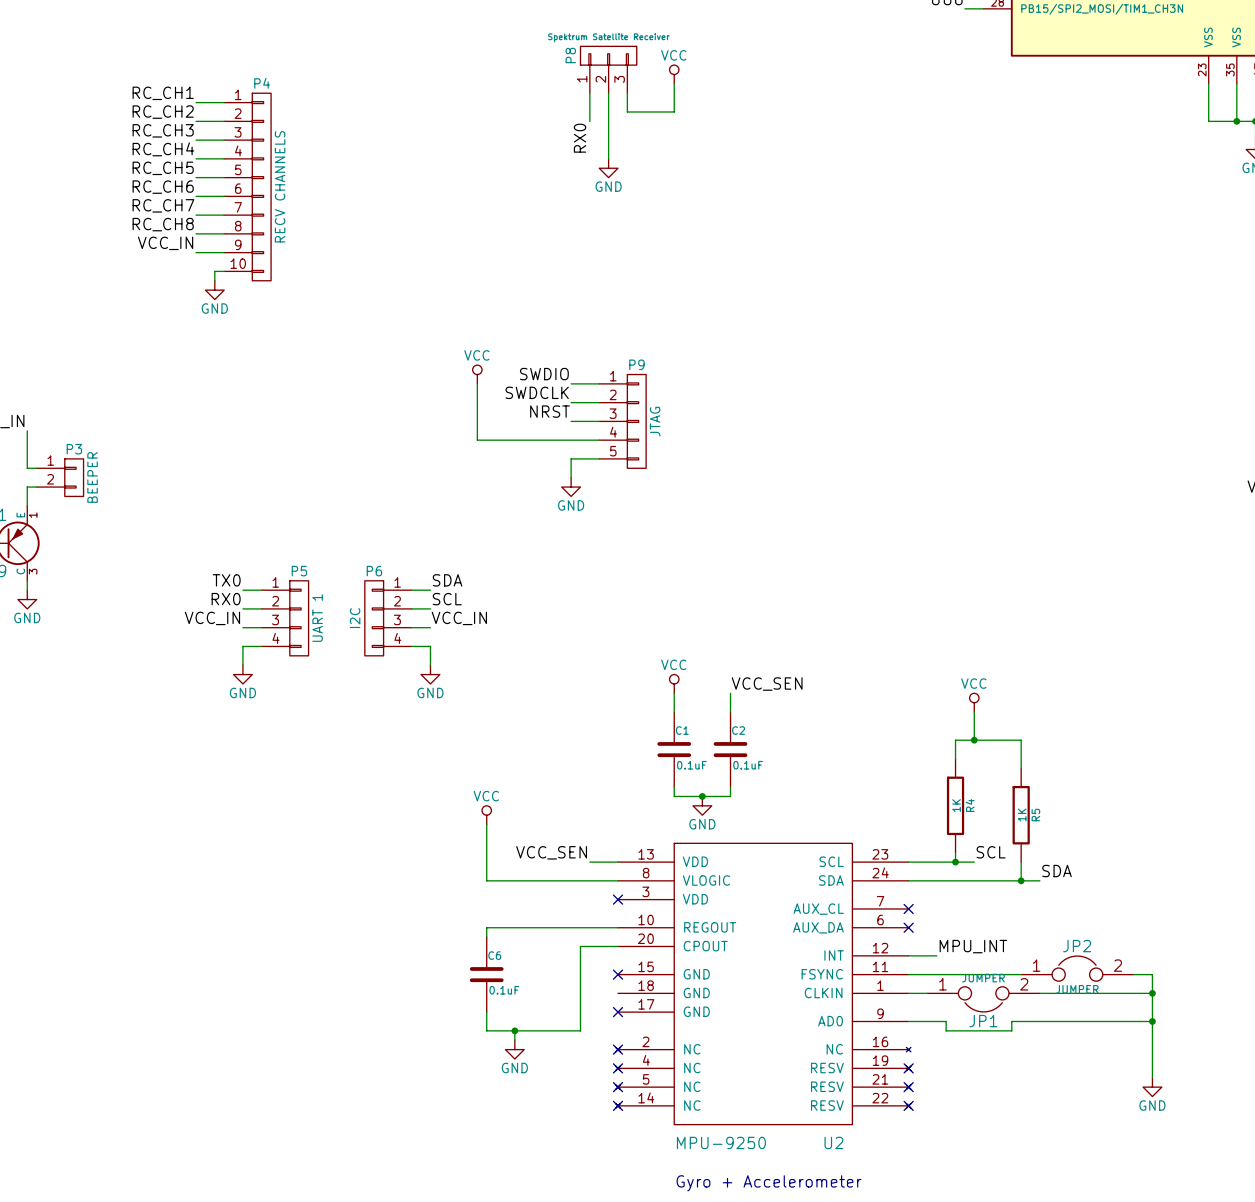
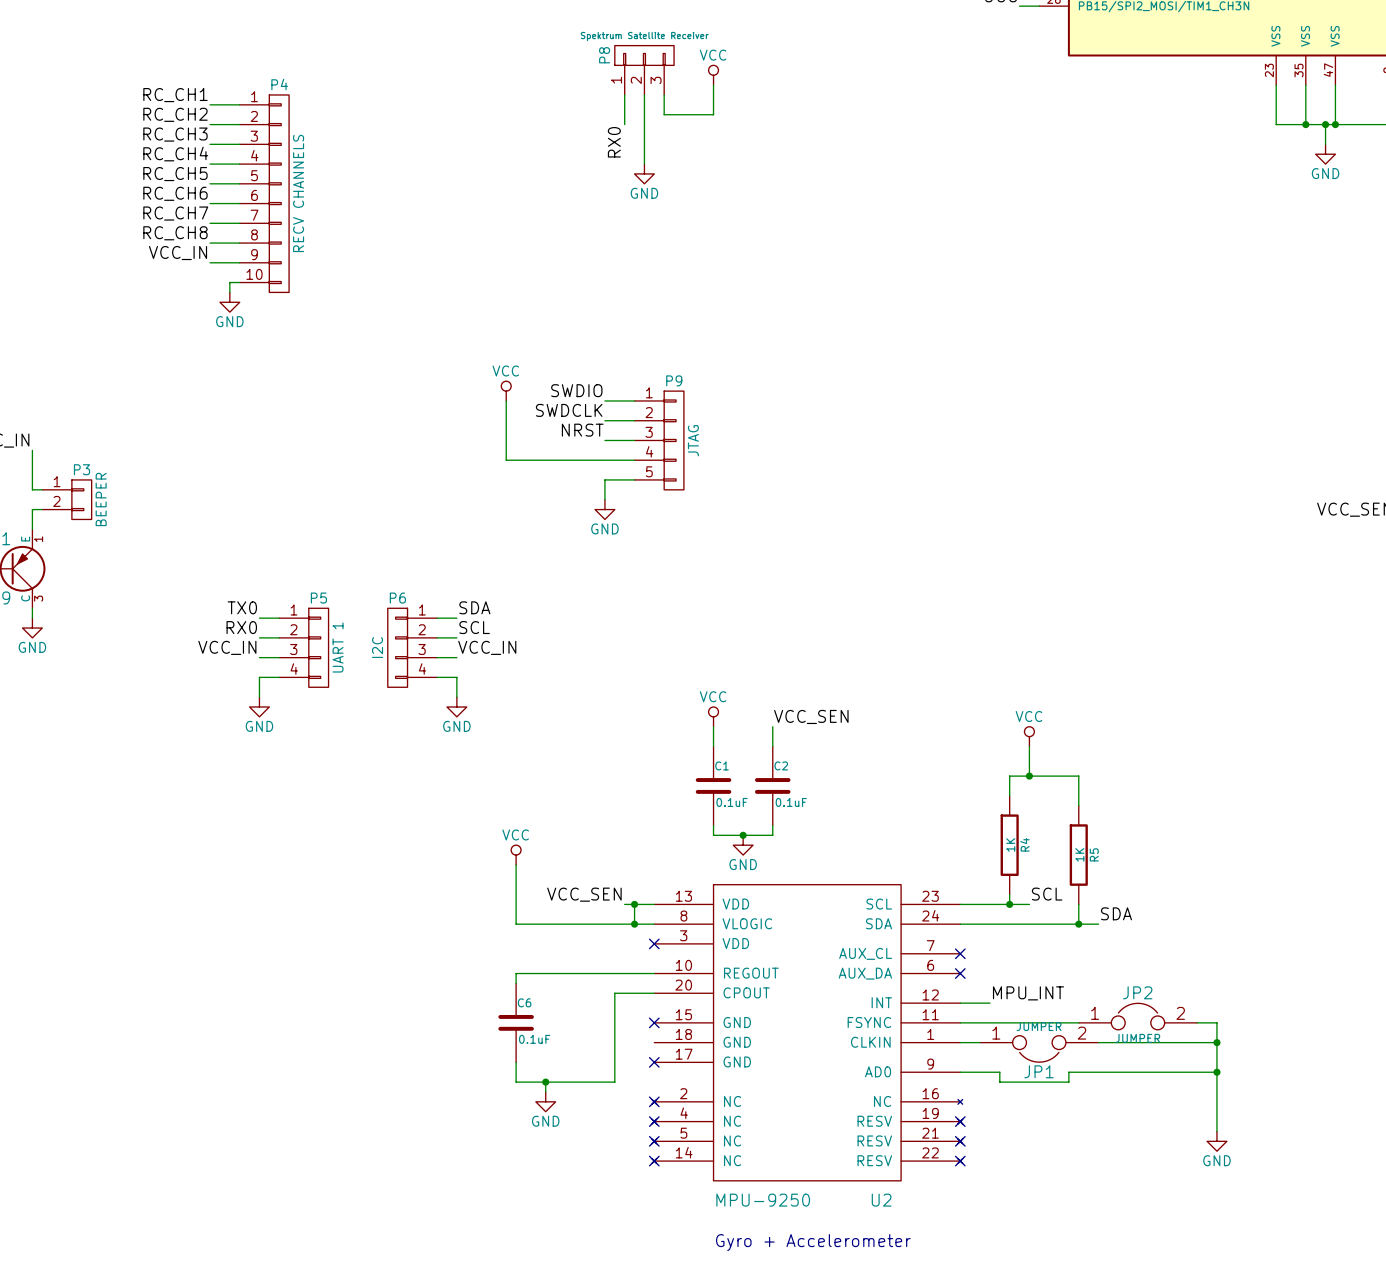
wire: none -> (634, 904) (634, 924)
junction: none -> (634, 904)
junction: none -> (634, 924)

